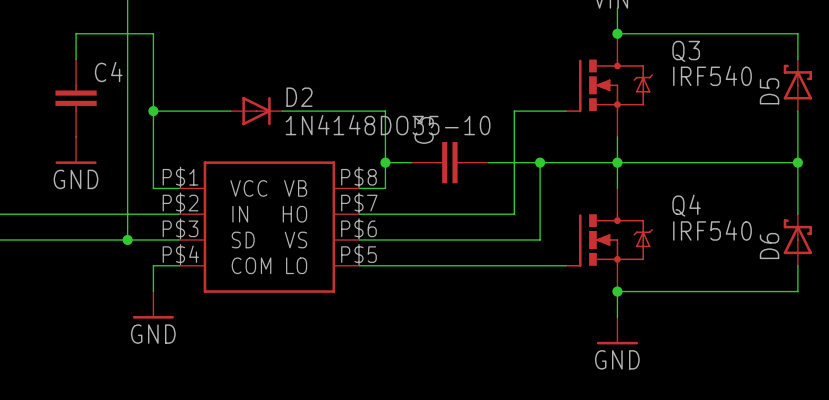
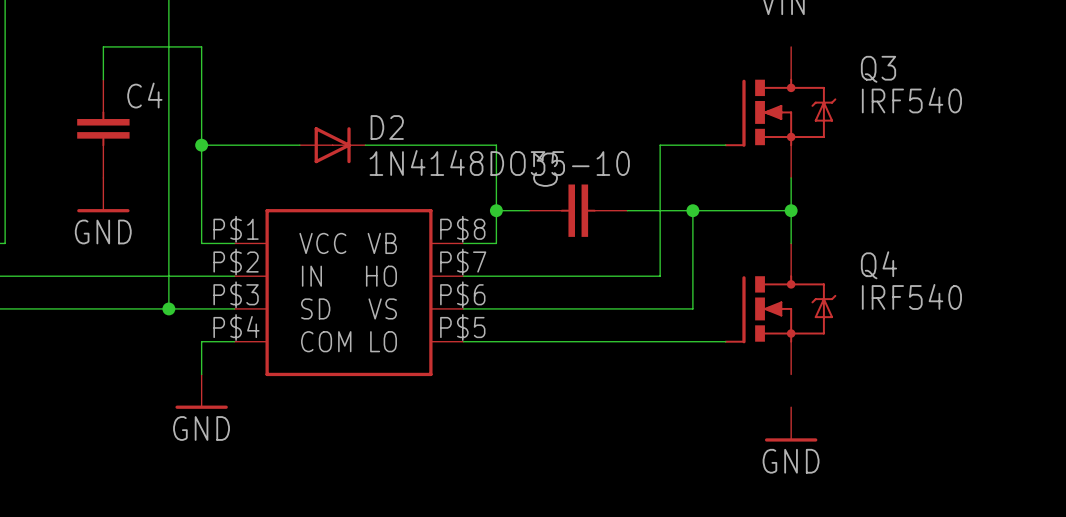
wire: (617, 7) (617, 33) (797, 33) (797, 59) -> none
junction: (617, 33) -> none
D5: (797, 85) -> none
wire: (797, 111) (797, 214) -> none
wire: (617, 162) (797, 162) -> none
junction: (797, 162) -> none
D6: (797, 239) -> none
wire: (797, 265) (797, 291) (617, 291) (617, 317) -> none
junction: (617, 291) -> none

